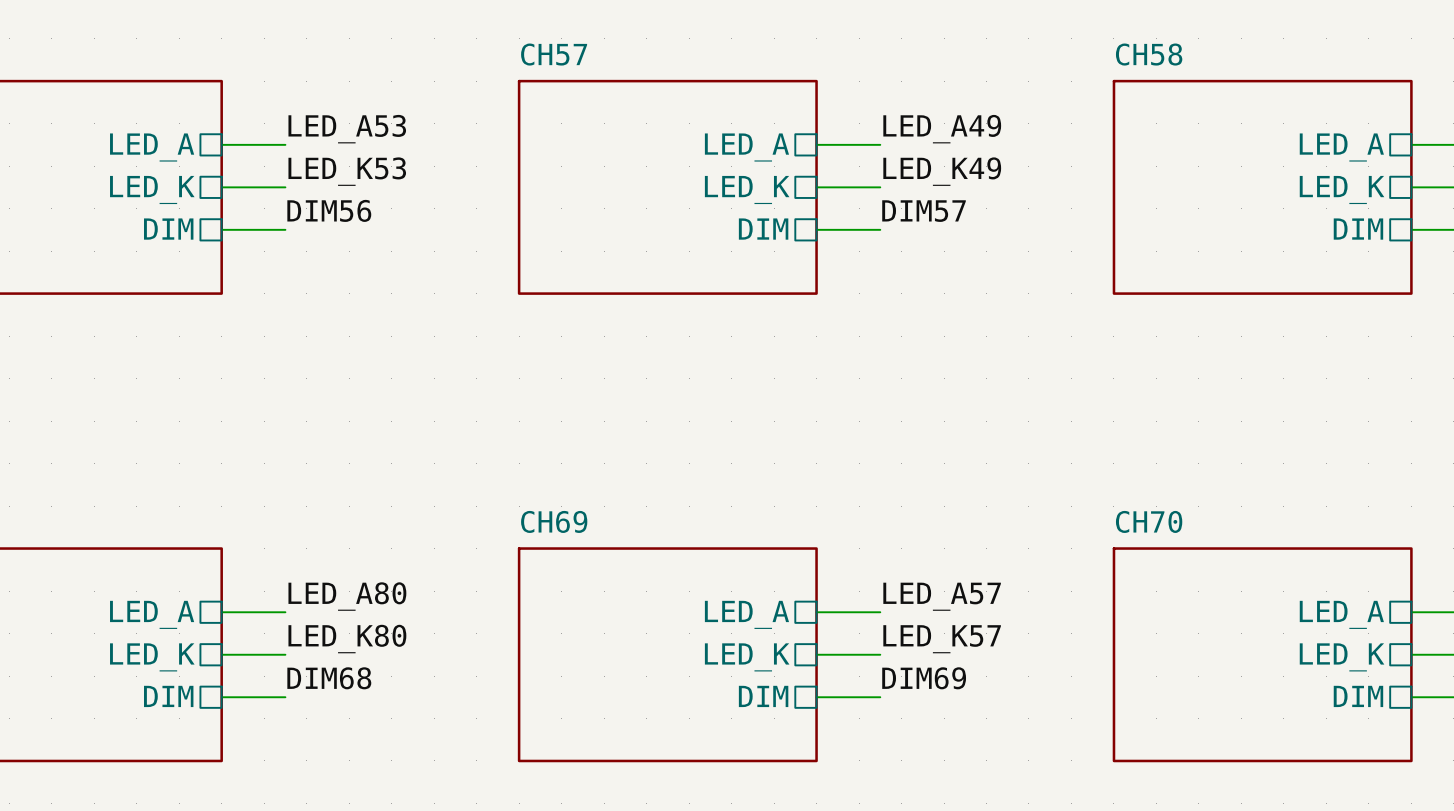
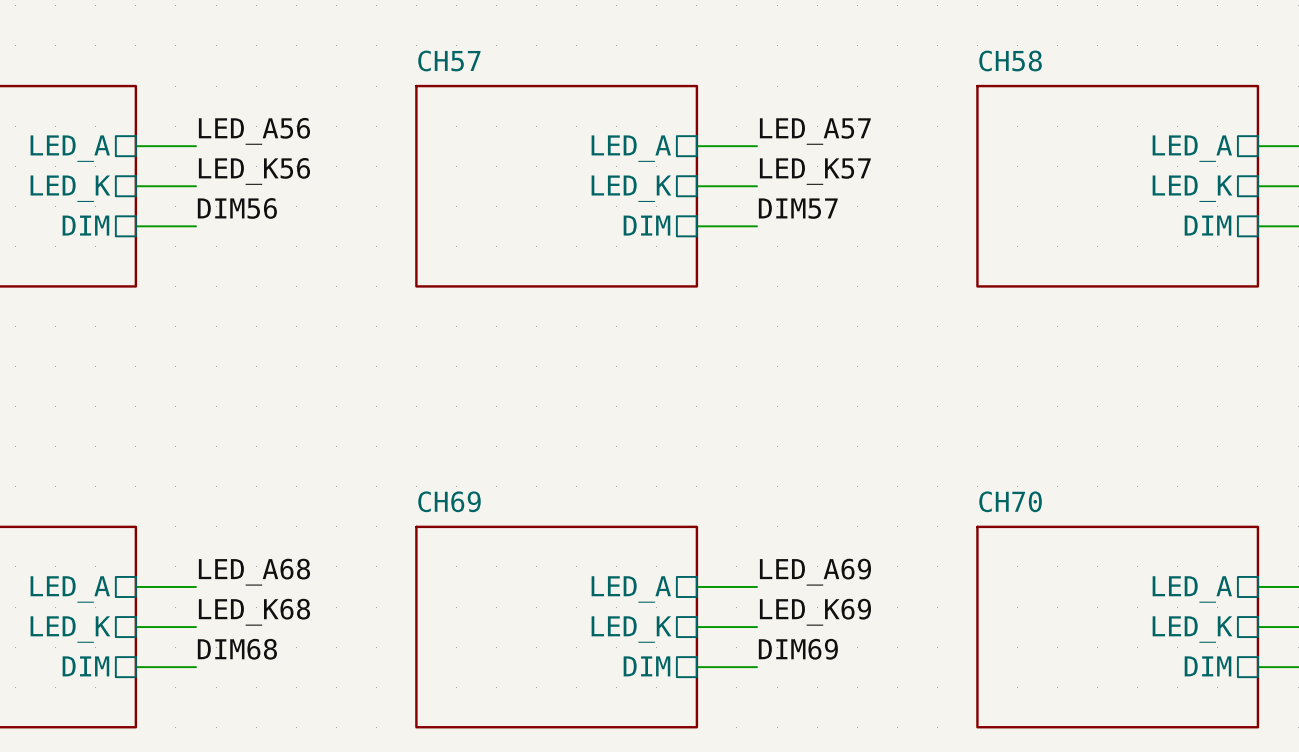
label: LED_A53 (347, 129) -> LED_A56 (254, 131)
label: LED_A49 (942, 129) -> LED_A57 (815, 131)
label: LED_K53 (347, 171) -> LED_K56 (254, 171)
label: LED_K49 (942, 171) -> LED_K57 (815, 171)
label: LED_A80 (347, 596) -> LED_A68 (254, 572)
label: LED_A57 (942, 596) -> LED_A69 (815, 572)
label: LED_K80 (347, 639) -> LED_K68 (254, 612)
label: LED_K57 (942, 639) -> LED_K69 (815, 612)

